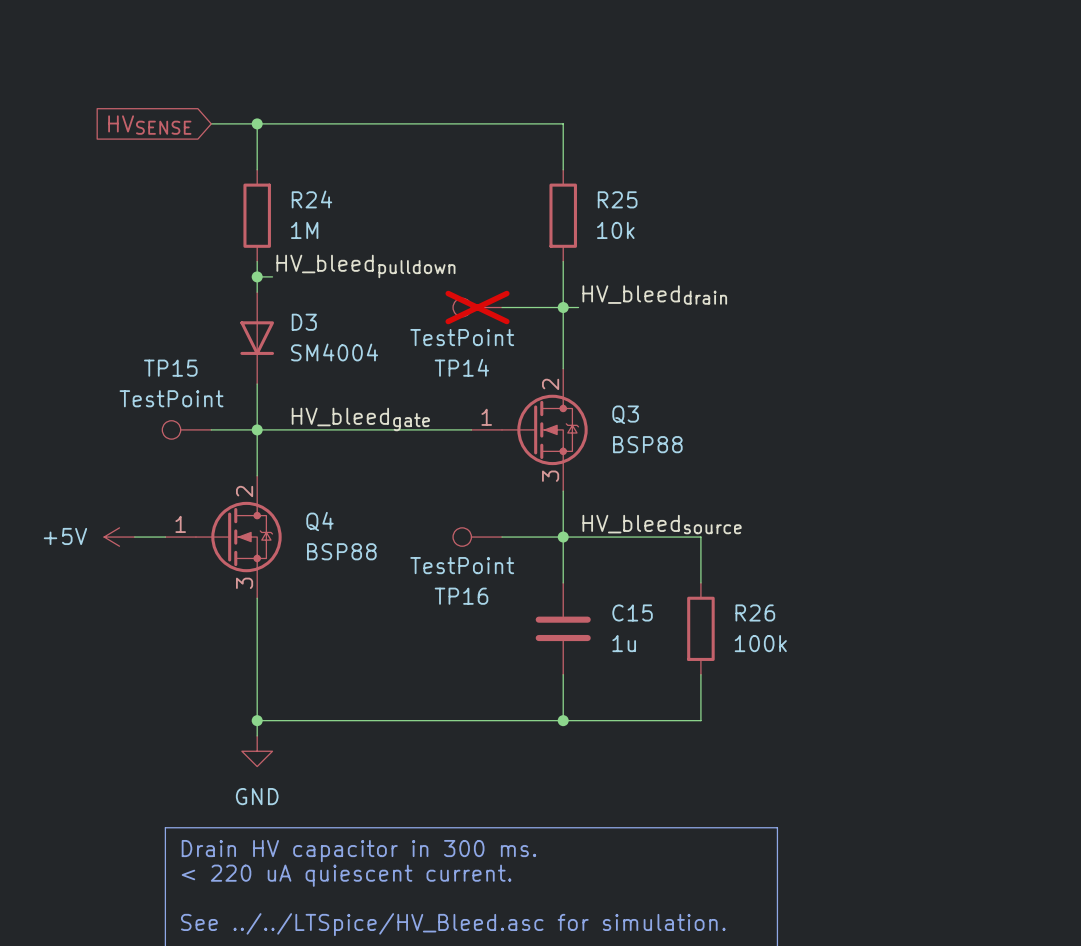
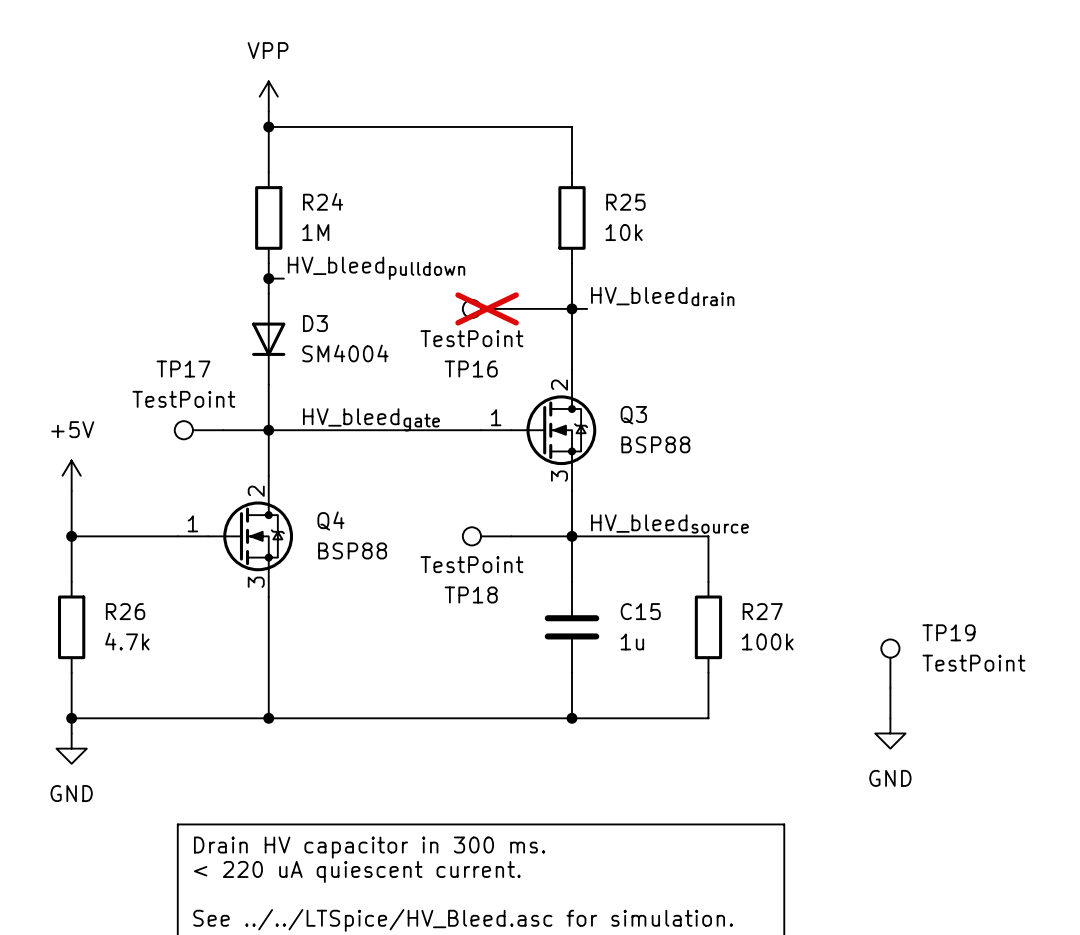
power symbol: none -> VPP (268, 96)
wire: (211, 123) (257, 123) -> (268, 111) (268, 126)
global label: HVSENSE (149, 125) -> none
TP14 name: TP14 (461, 367) -> TP16 (471, 369)
TP15 name: TP15 (170, 368) -> TP17 (183, 369)
wire: none -> (71, 490) (71, 581)
wire: none -> (71, 536) (147, 536)
junction: none -> (71, 536)
power symbol rotation: 0° (119, 537) -> 90° clockwise (71, 475)
power symbol position: +5V (119, 537) -> +5V (71, 475)
TP16 name: TP16 (461, 596) -> TP18 (471, 594)
R26 name: R26 (755, 612) -> R27 (762, 611)
R26: none -> 4.7k (71, 627)
TP19: none -> TestPoint (890, 663)
wire: none -> (71, 672) (71, 733)
wire: none -> (890, 687) (890, 718)
junction: none -> (71, 718)
wire: (257, 720) (257, 735) -> (268, 718) (71, 718)
power symbol: none -> GND (890, 733)
power symbol position: GND (257, 751) -> GND (71, 748)

